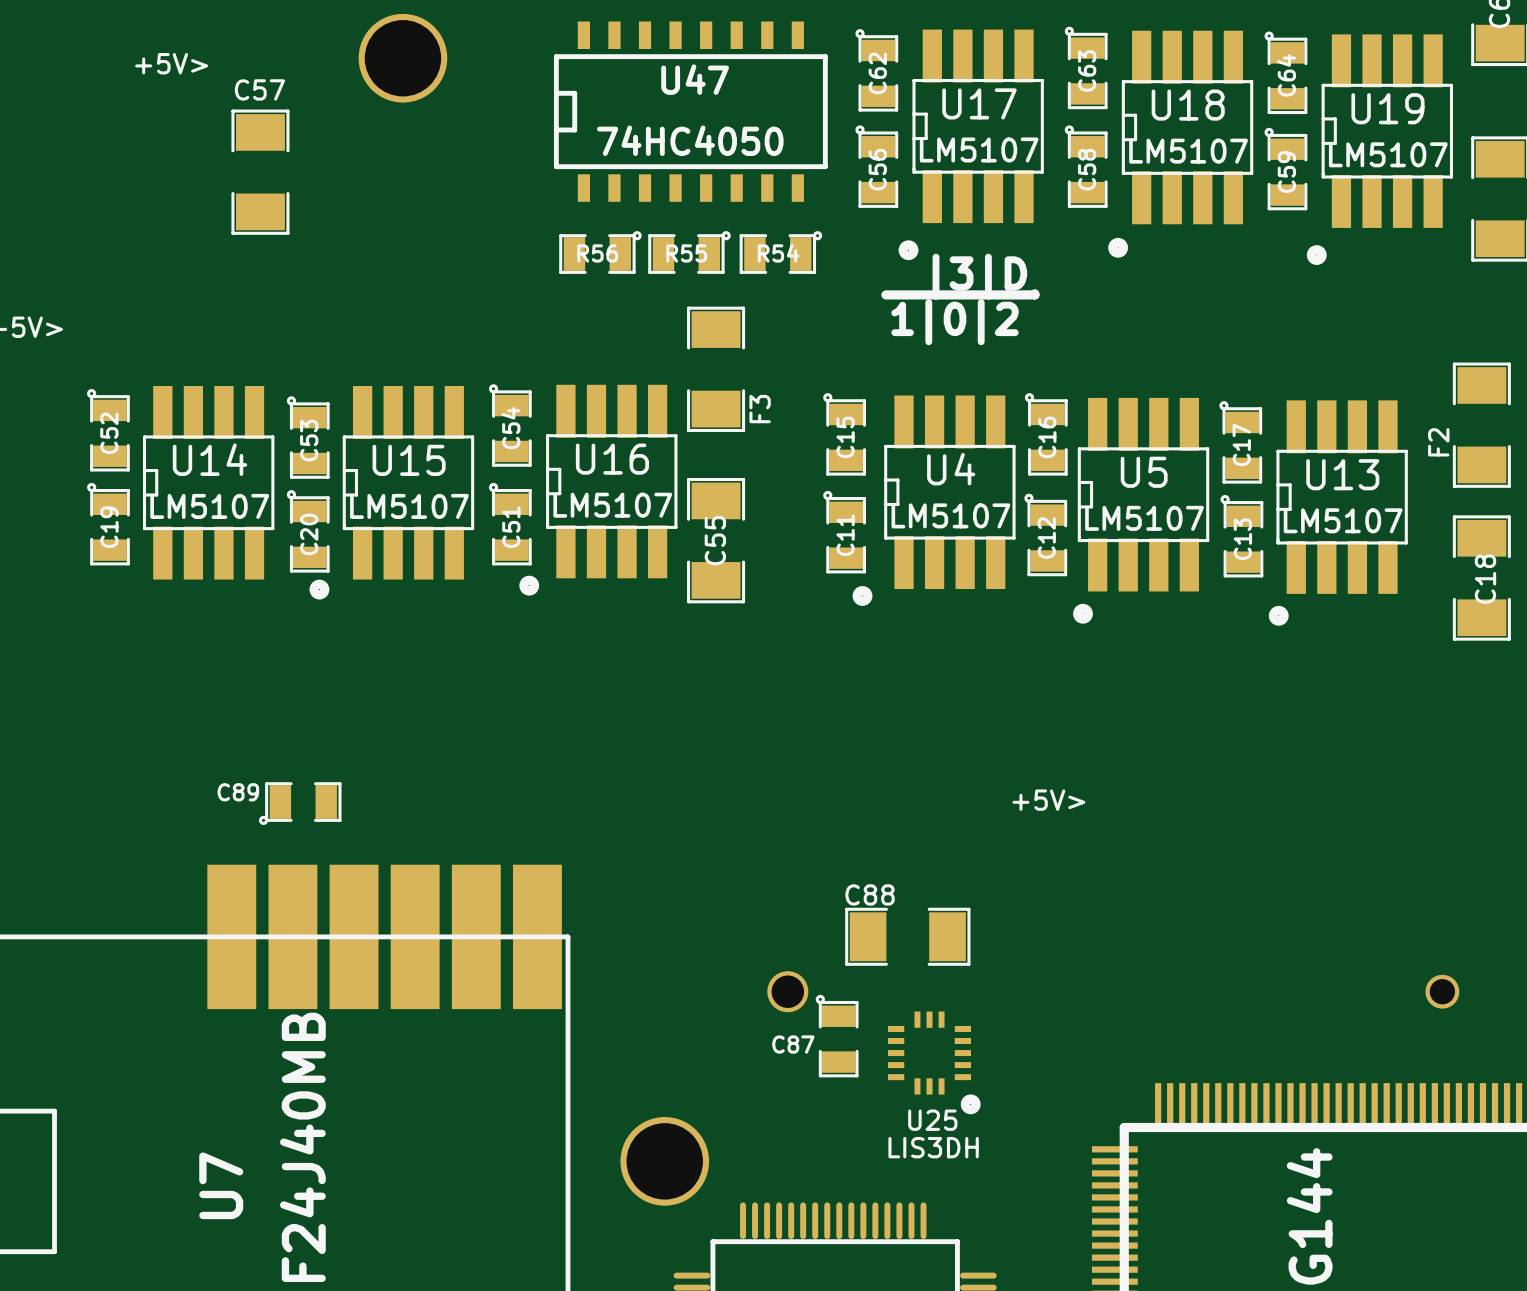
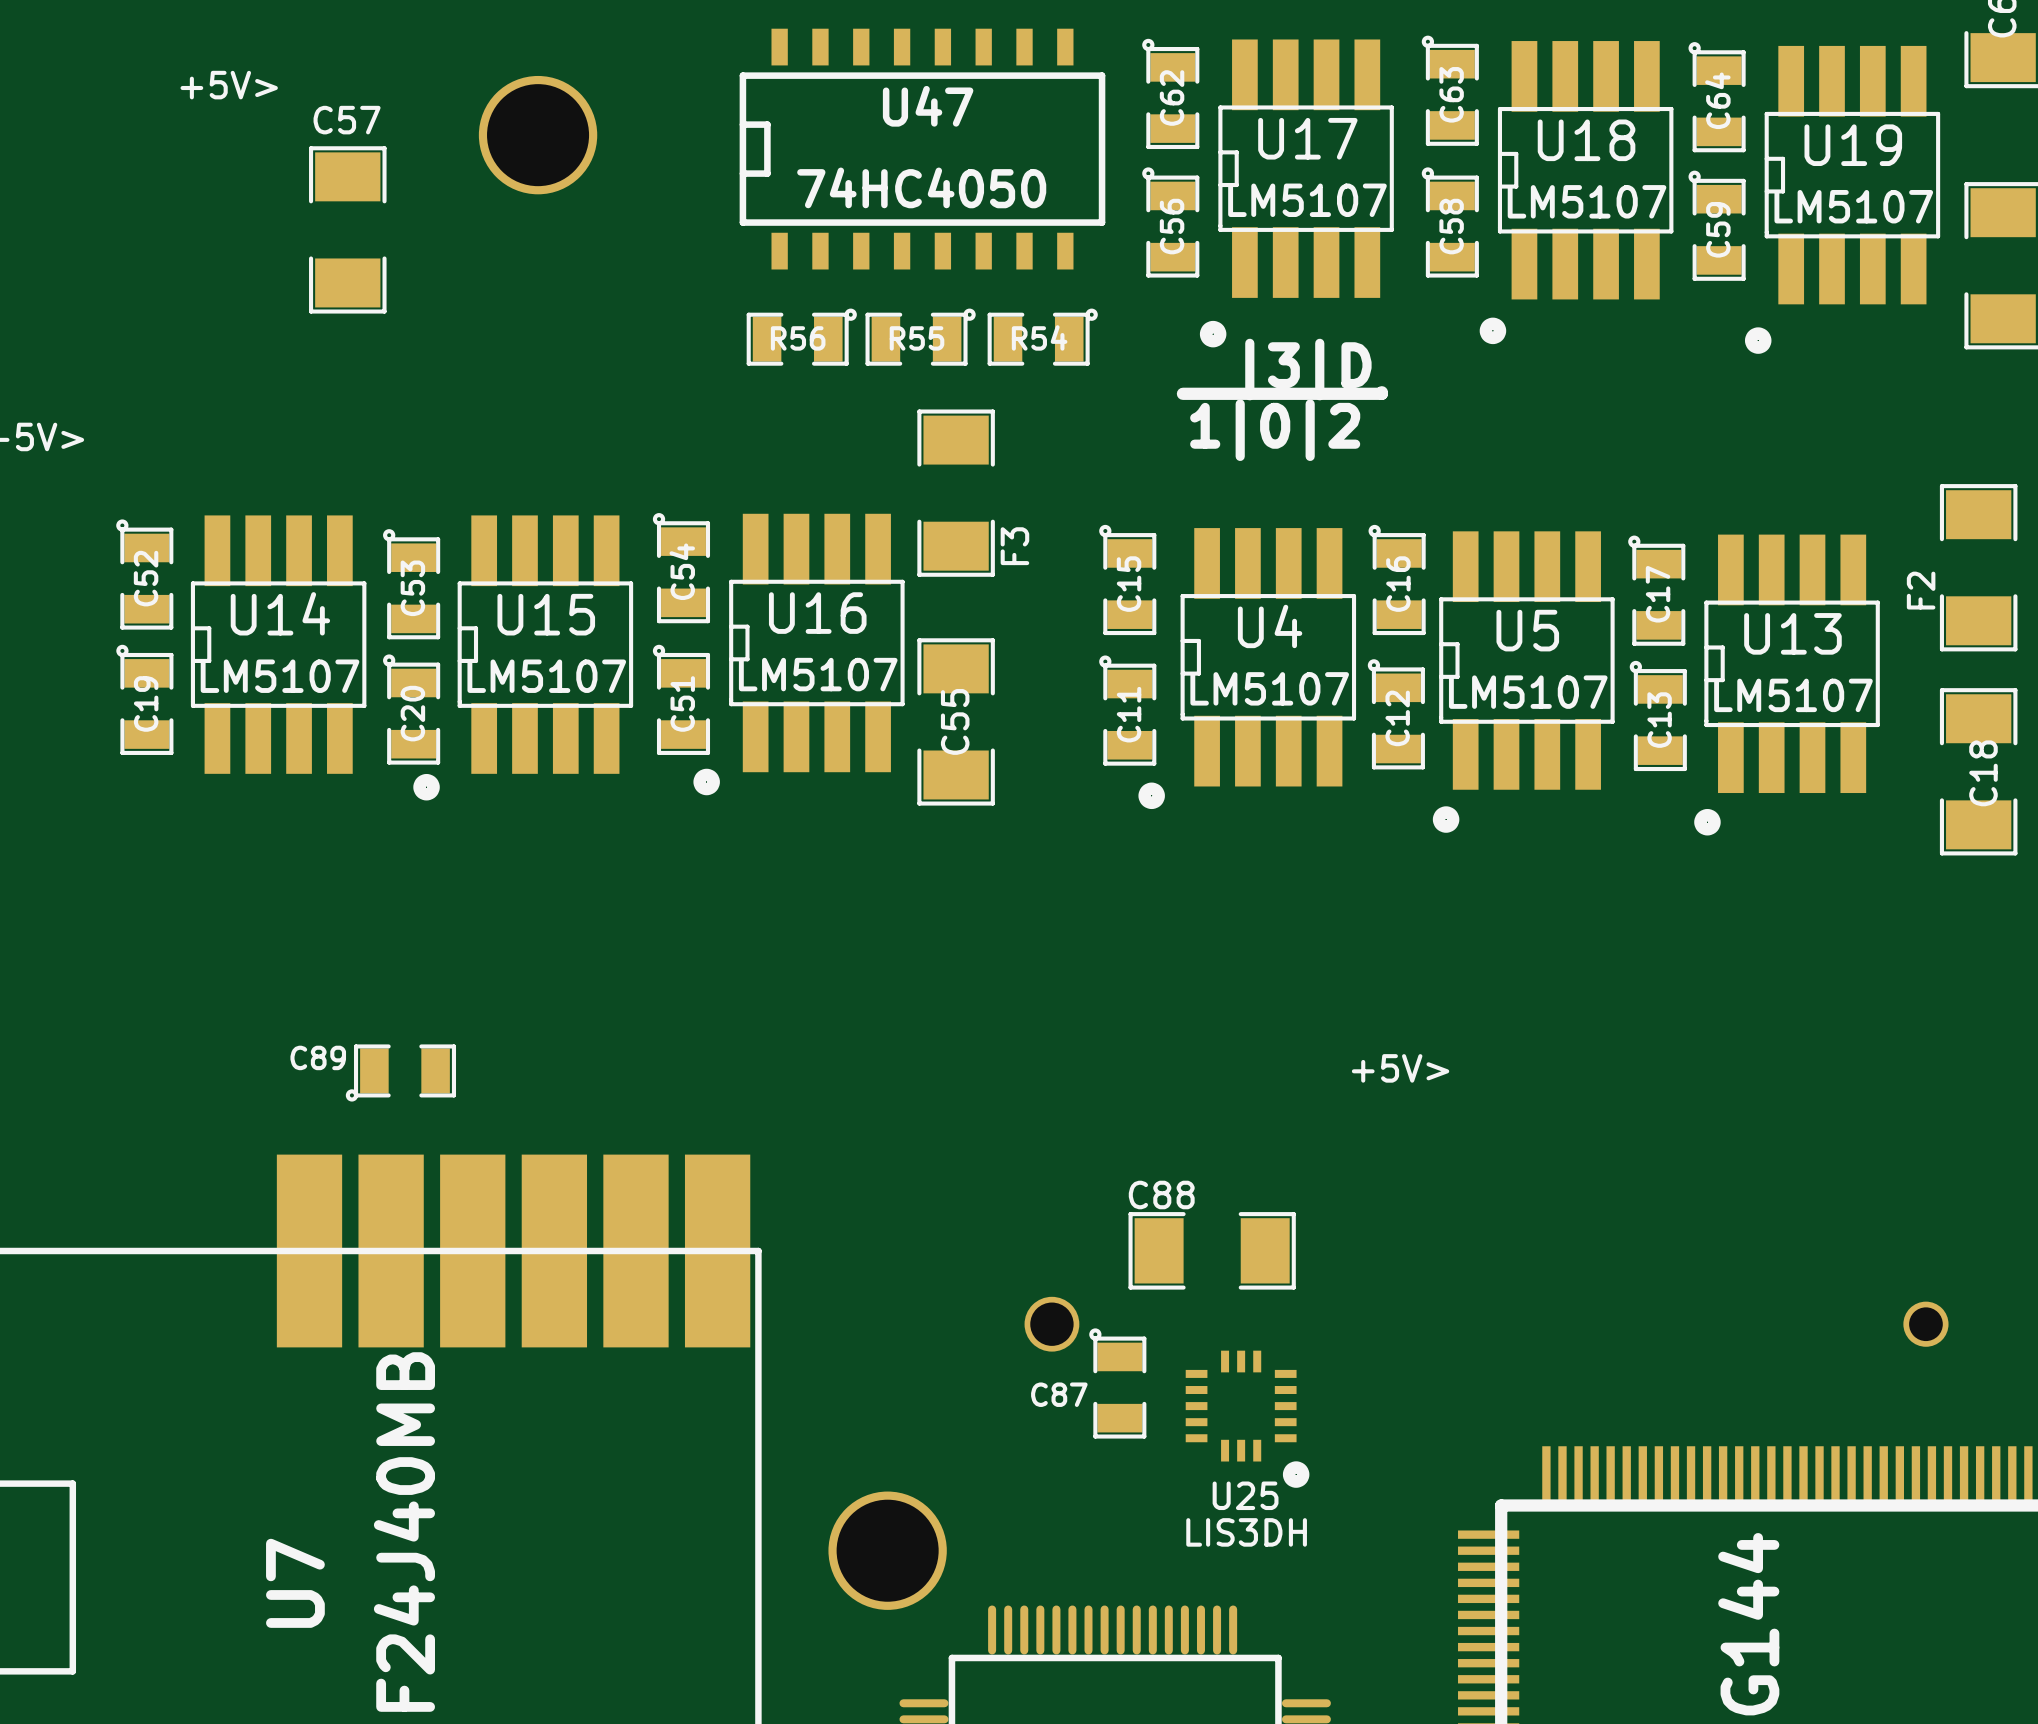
part position: (402, 58) -> (538, 135)

